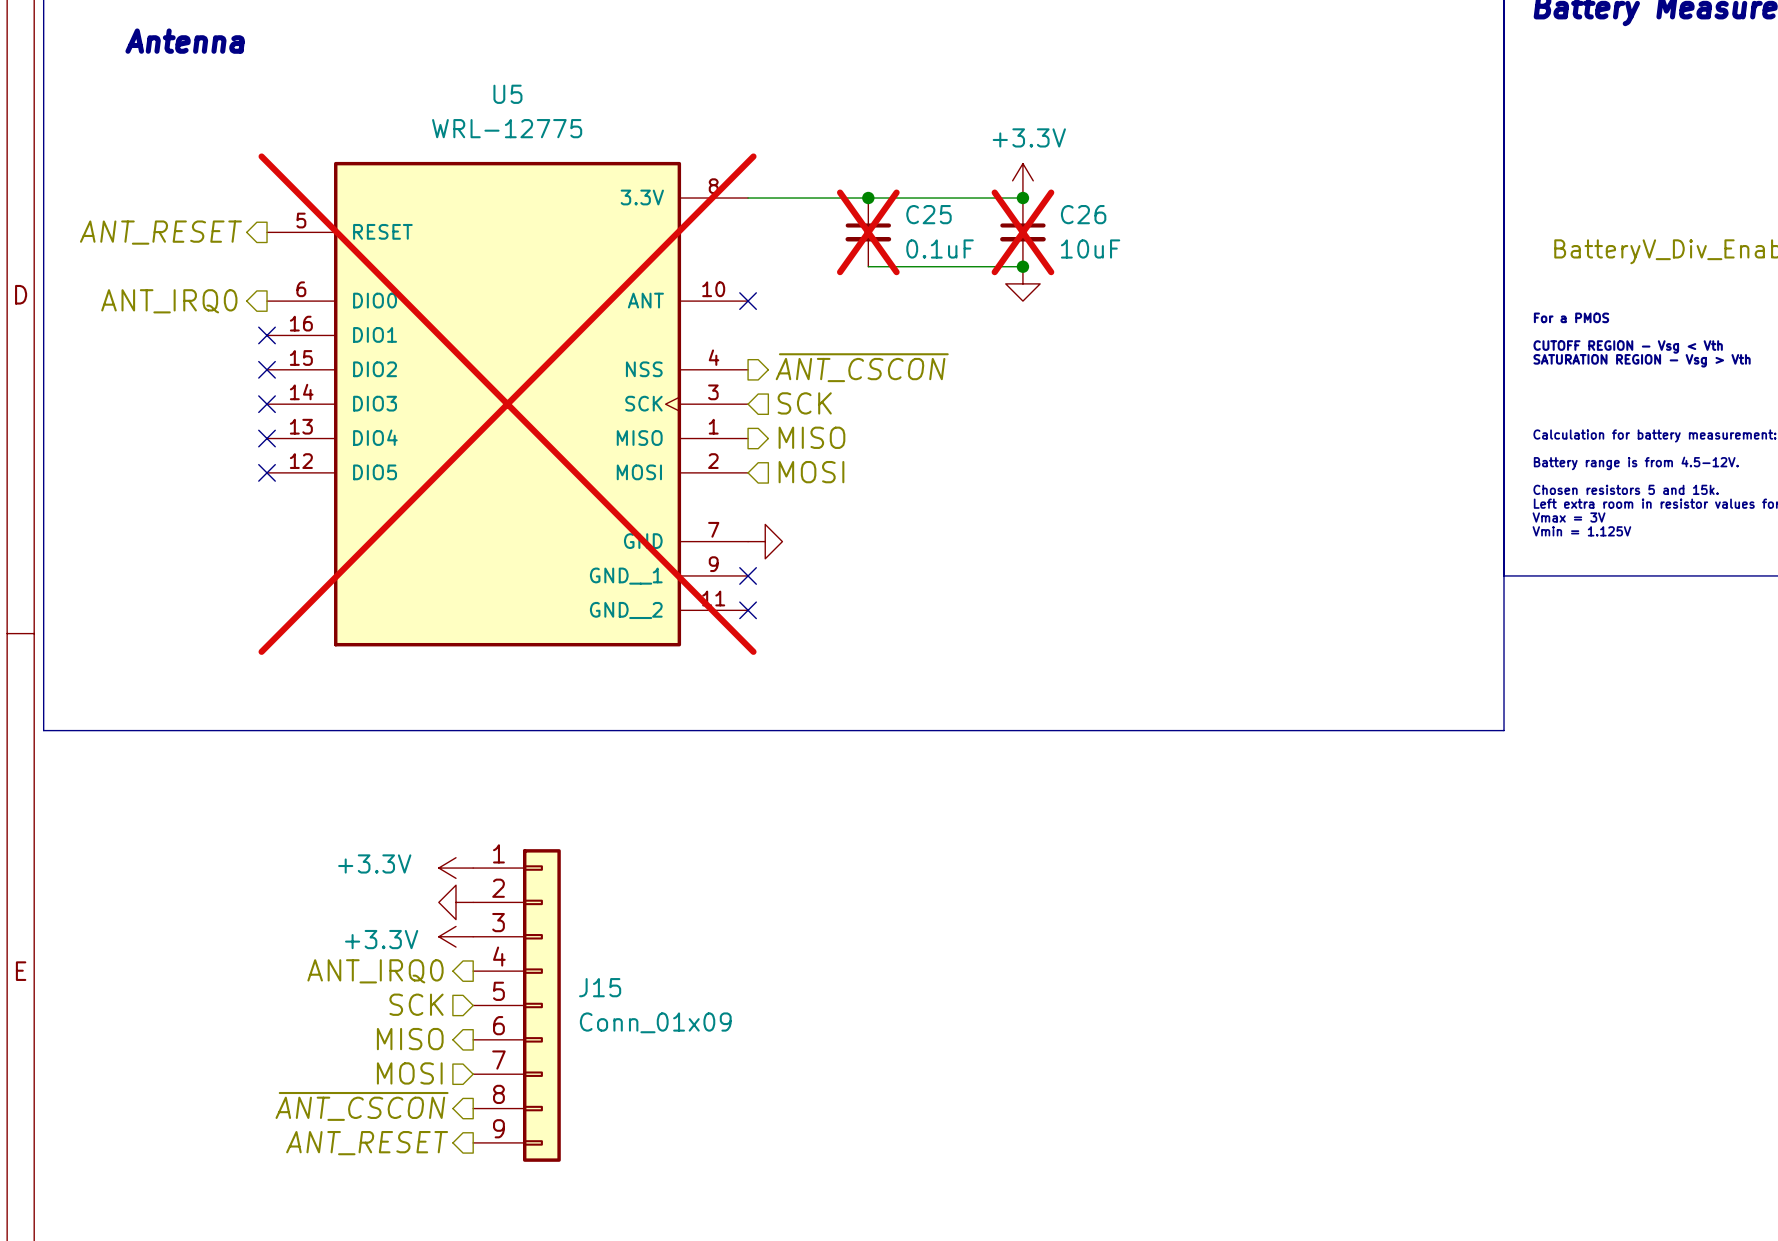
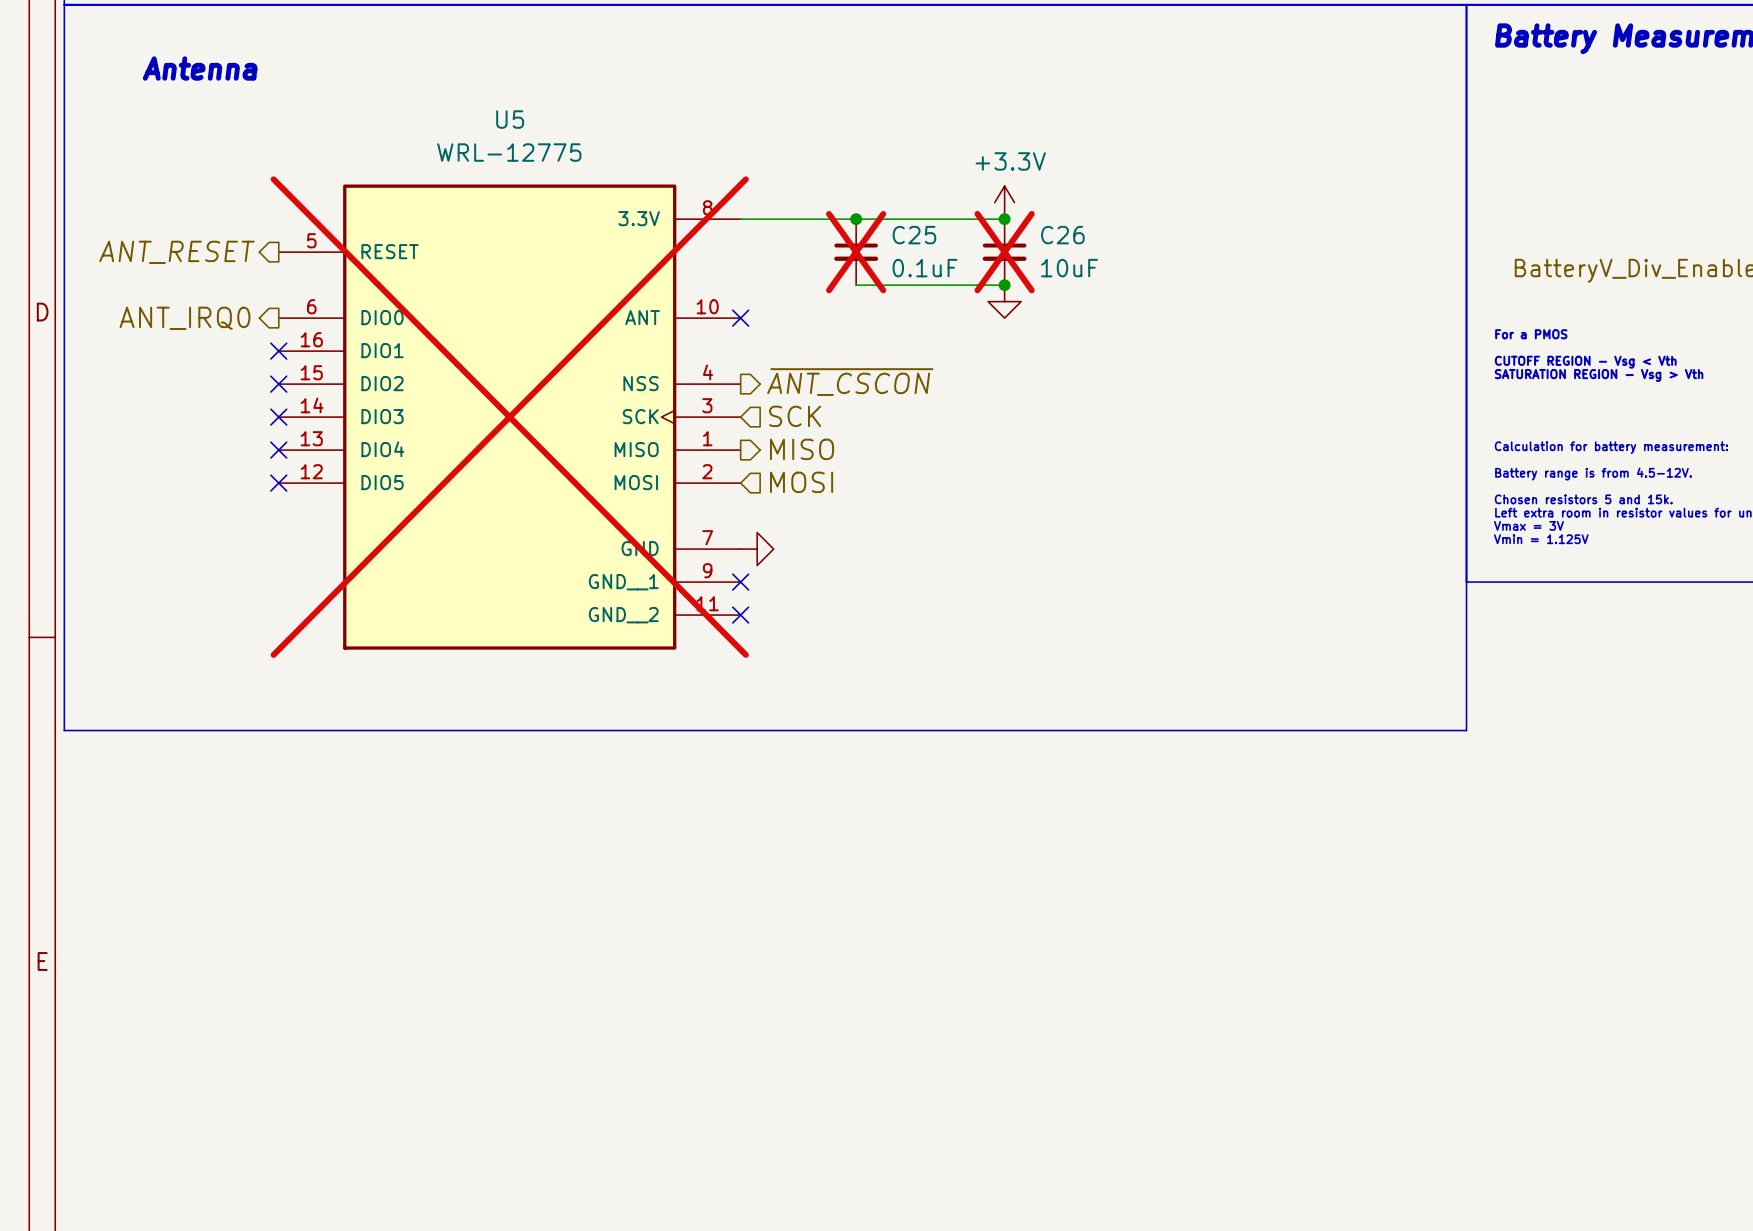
power symbol: +3.3V (456, 868) -> none
power symbol: (456, 902) -> none
power symbol: +3.3V (456, 936) -> none
hierarchical label: ANT_IRQ0 (375, 971) -> none
hierarchical label: SCK (416, 1004) -> none
J15: Conn_01x09 (516, 1005) -> none
hierarchical label: MISO (410, 1039) -> none
hierarchical label: MOSI (409, 1073) -> none
hierarchical label: ~{ANT_CSCON} (362, 1106) -> none
hierarchical label: ANT_RESET (367, 1143) -> none

